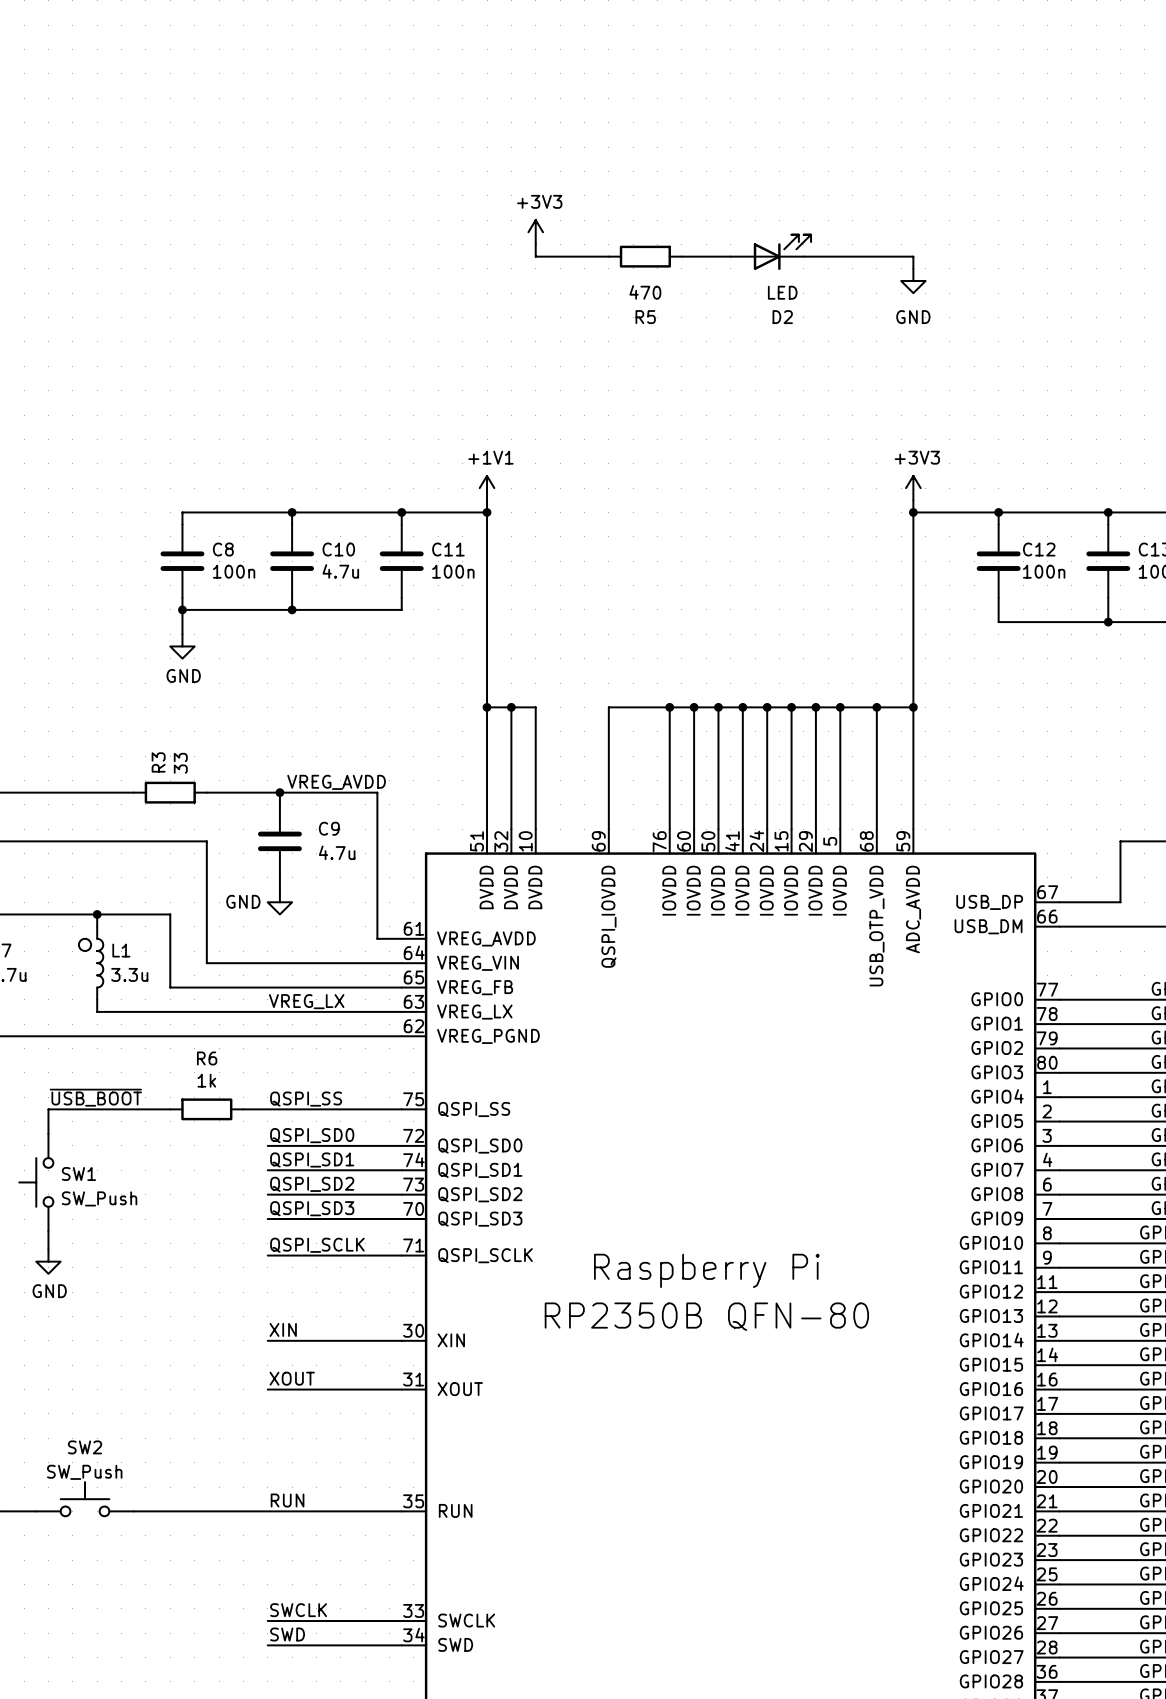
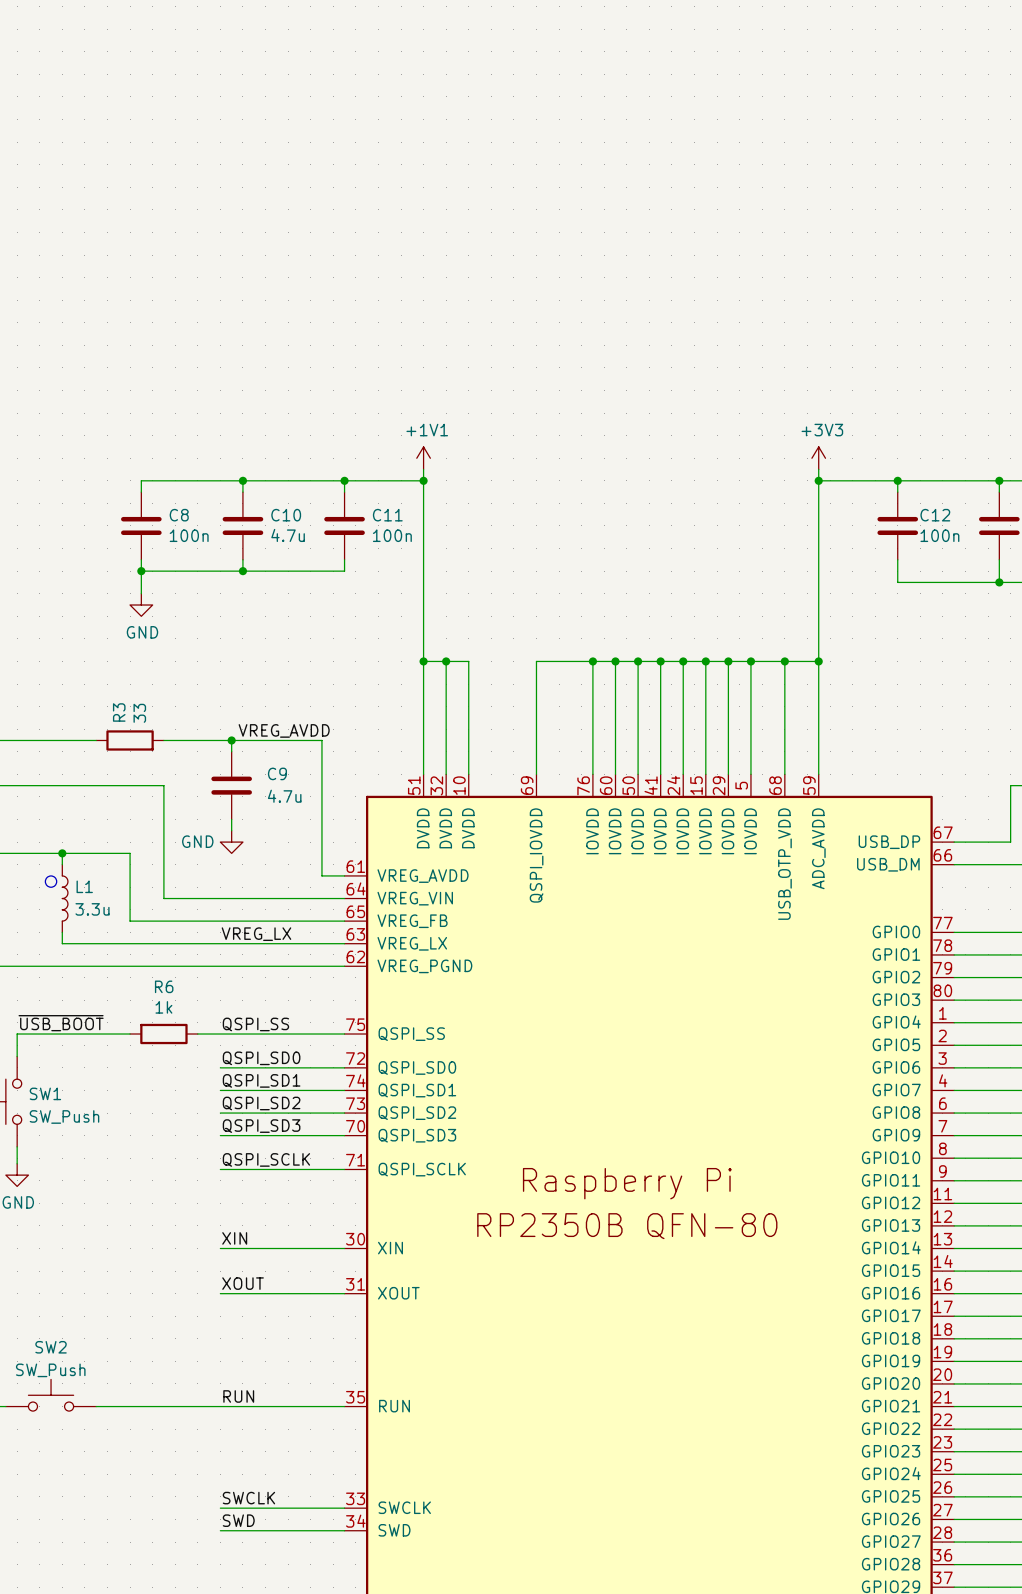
power symbol: +3V3 (535, 232) -> none
wire: (535, 244) (535, 256) (608, 256) -> none
D2: LED (770, 252) -> none
R5: 470 (645, 256) -> none
wire: (681, 256) (730, 256) -> none
wire: (803, 256) (913, 256) (913, 268) -> none
power symbol: GND (913, 281) -> none

